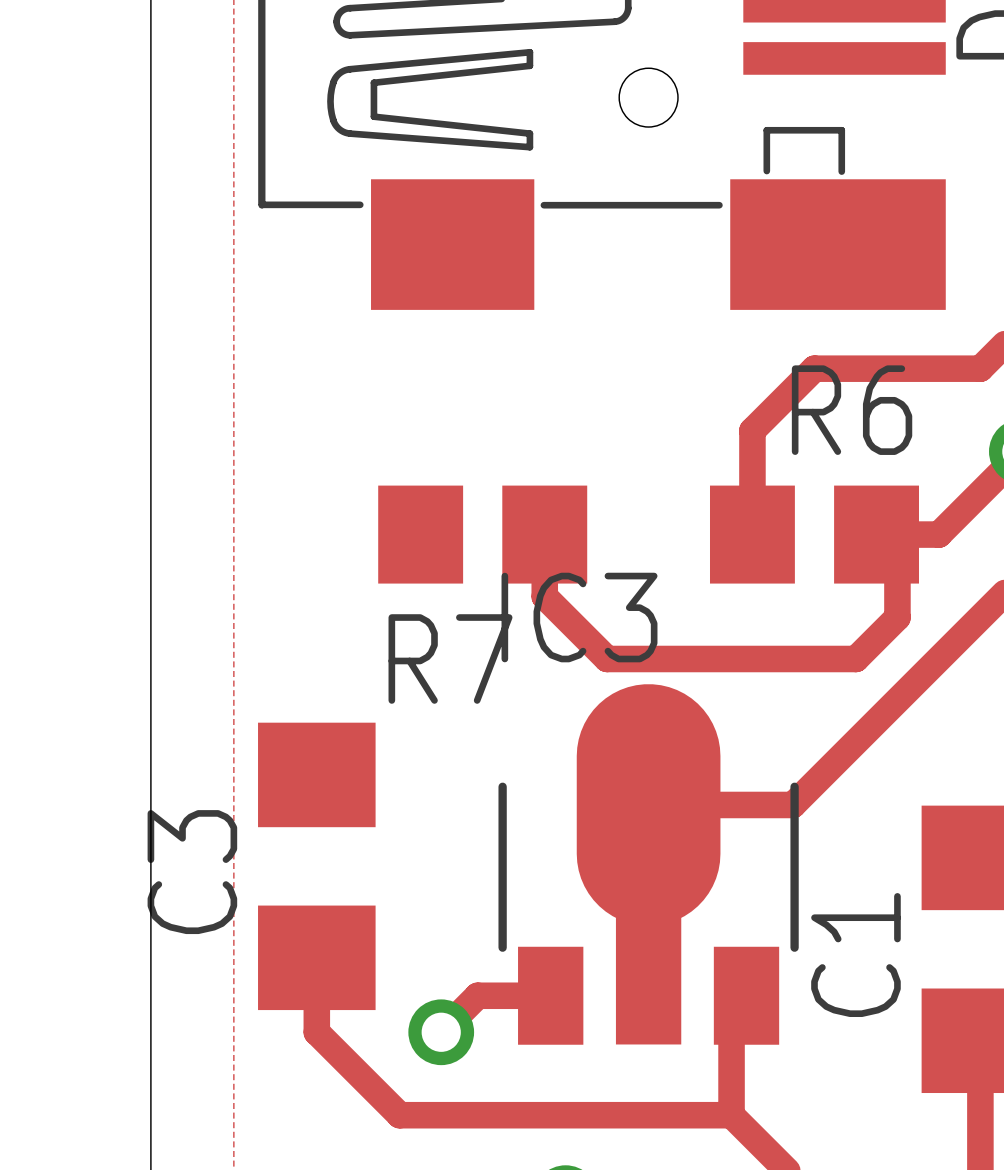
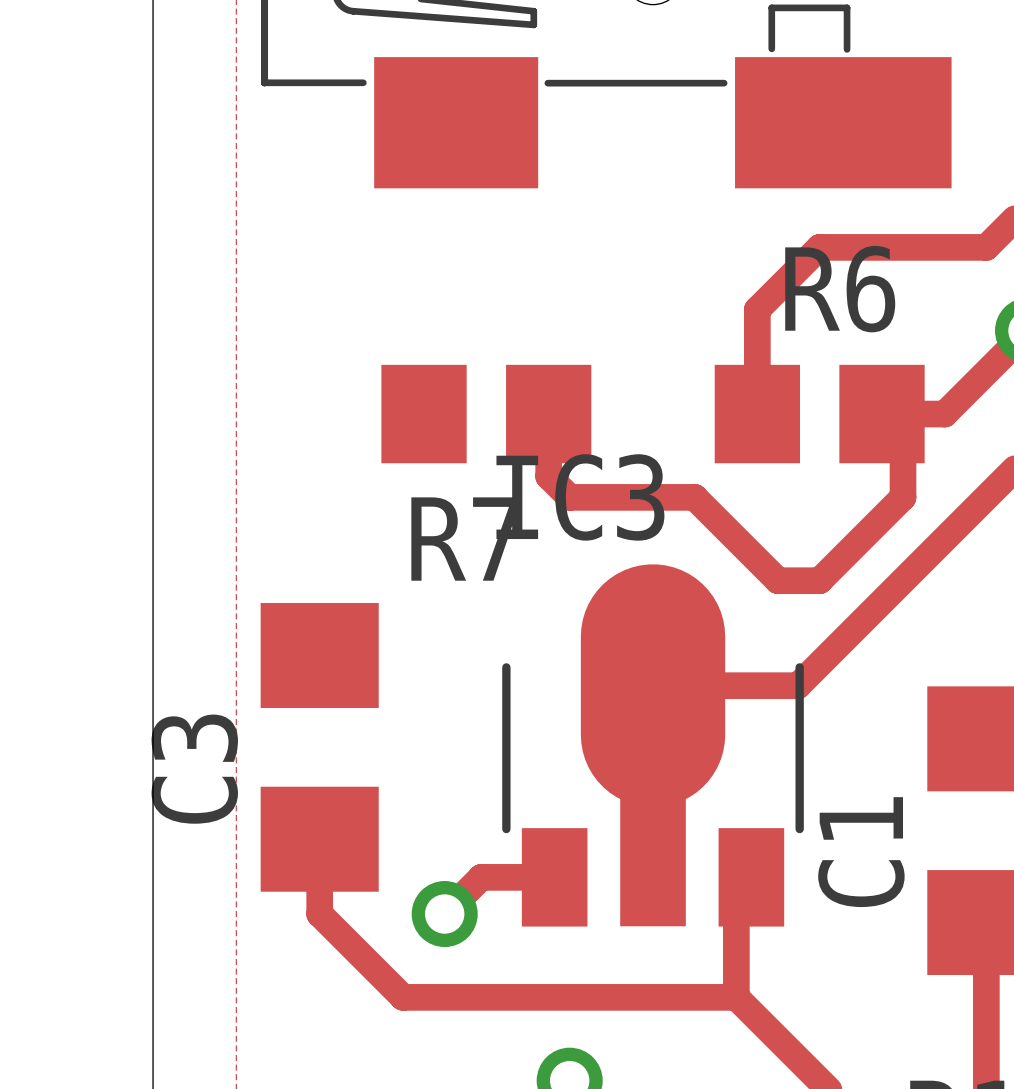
track: (565, 617) (607, 659) (855, 659) -> (569, 497) (694, 497) (778, 580) (819, 580) (861, 539)

